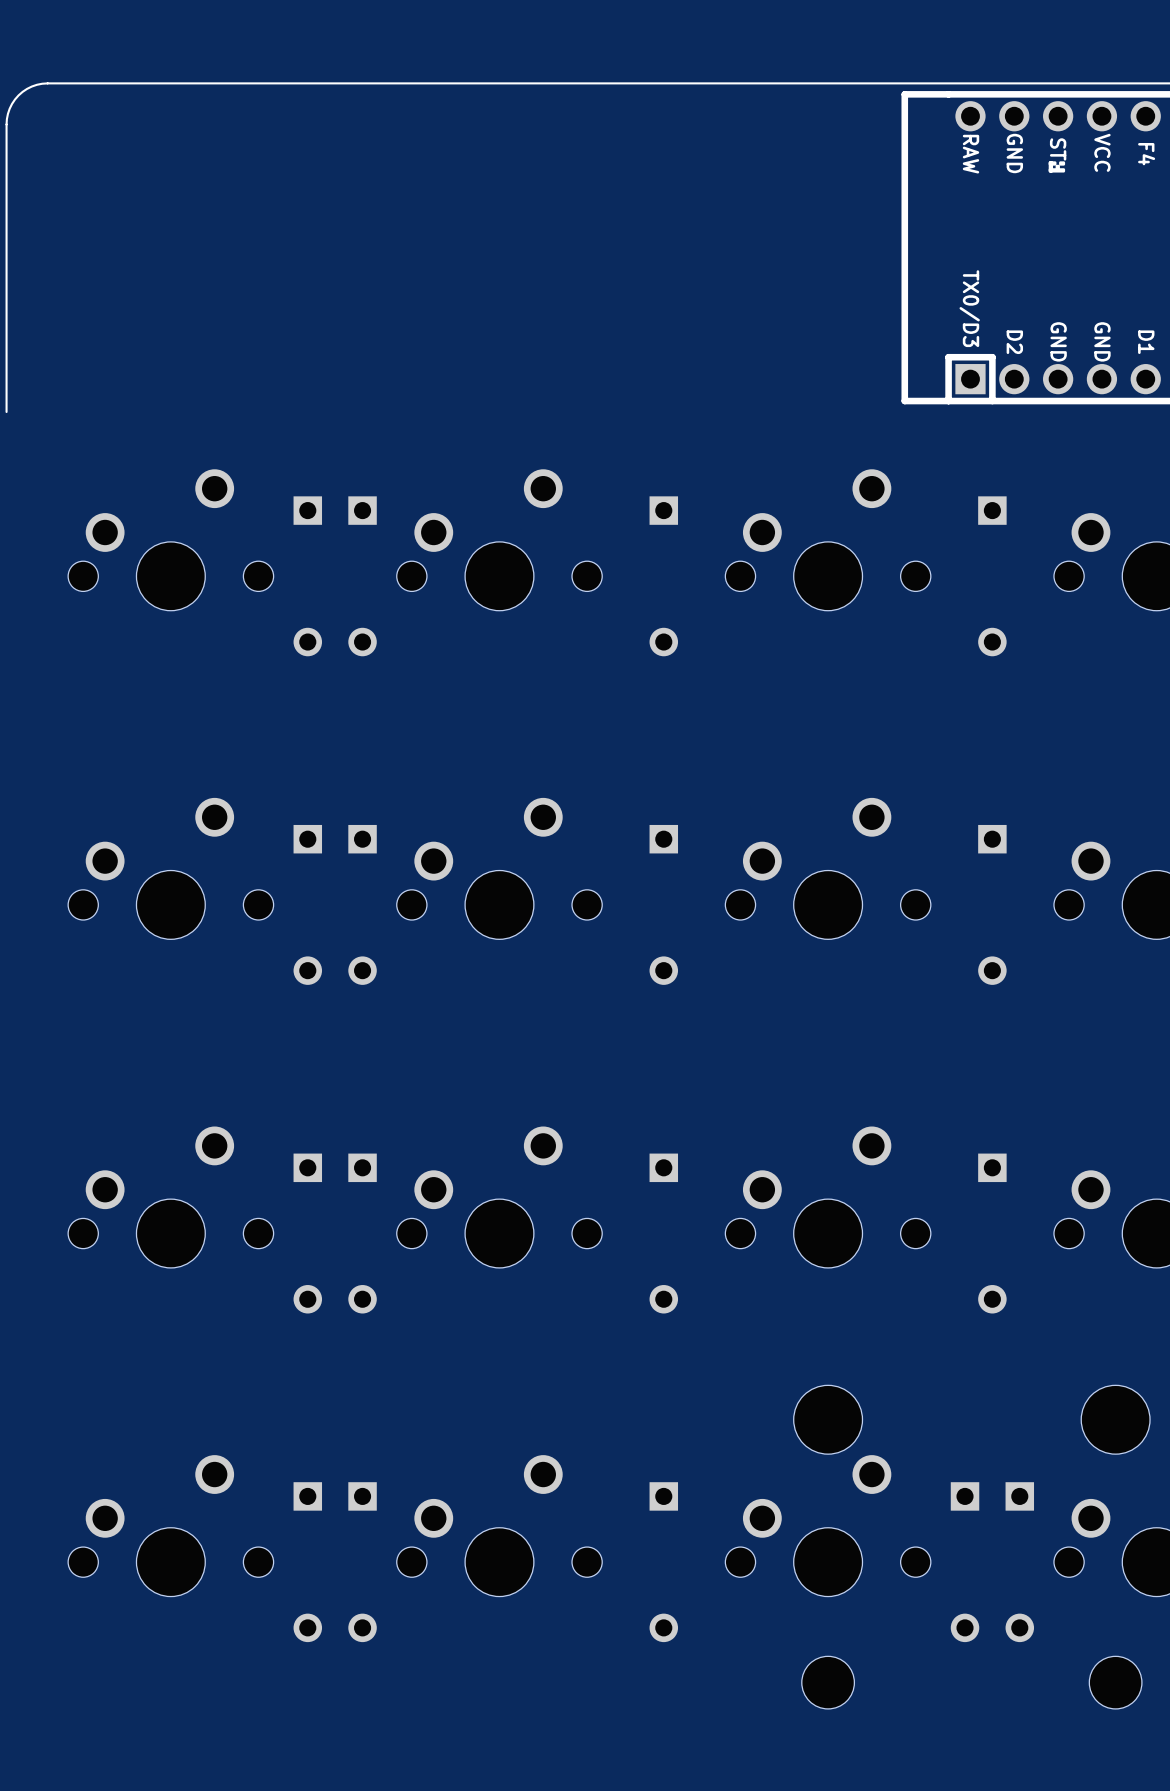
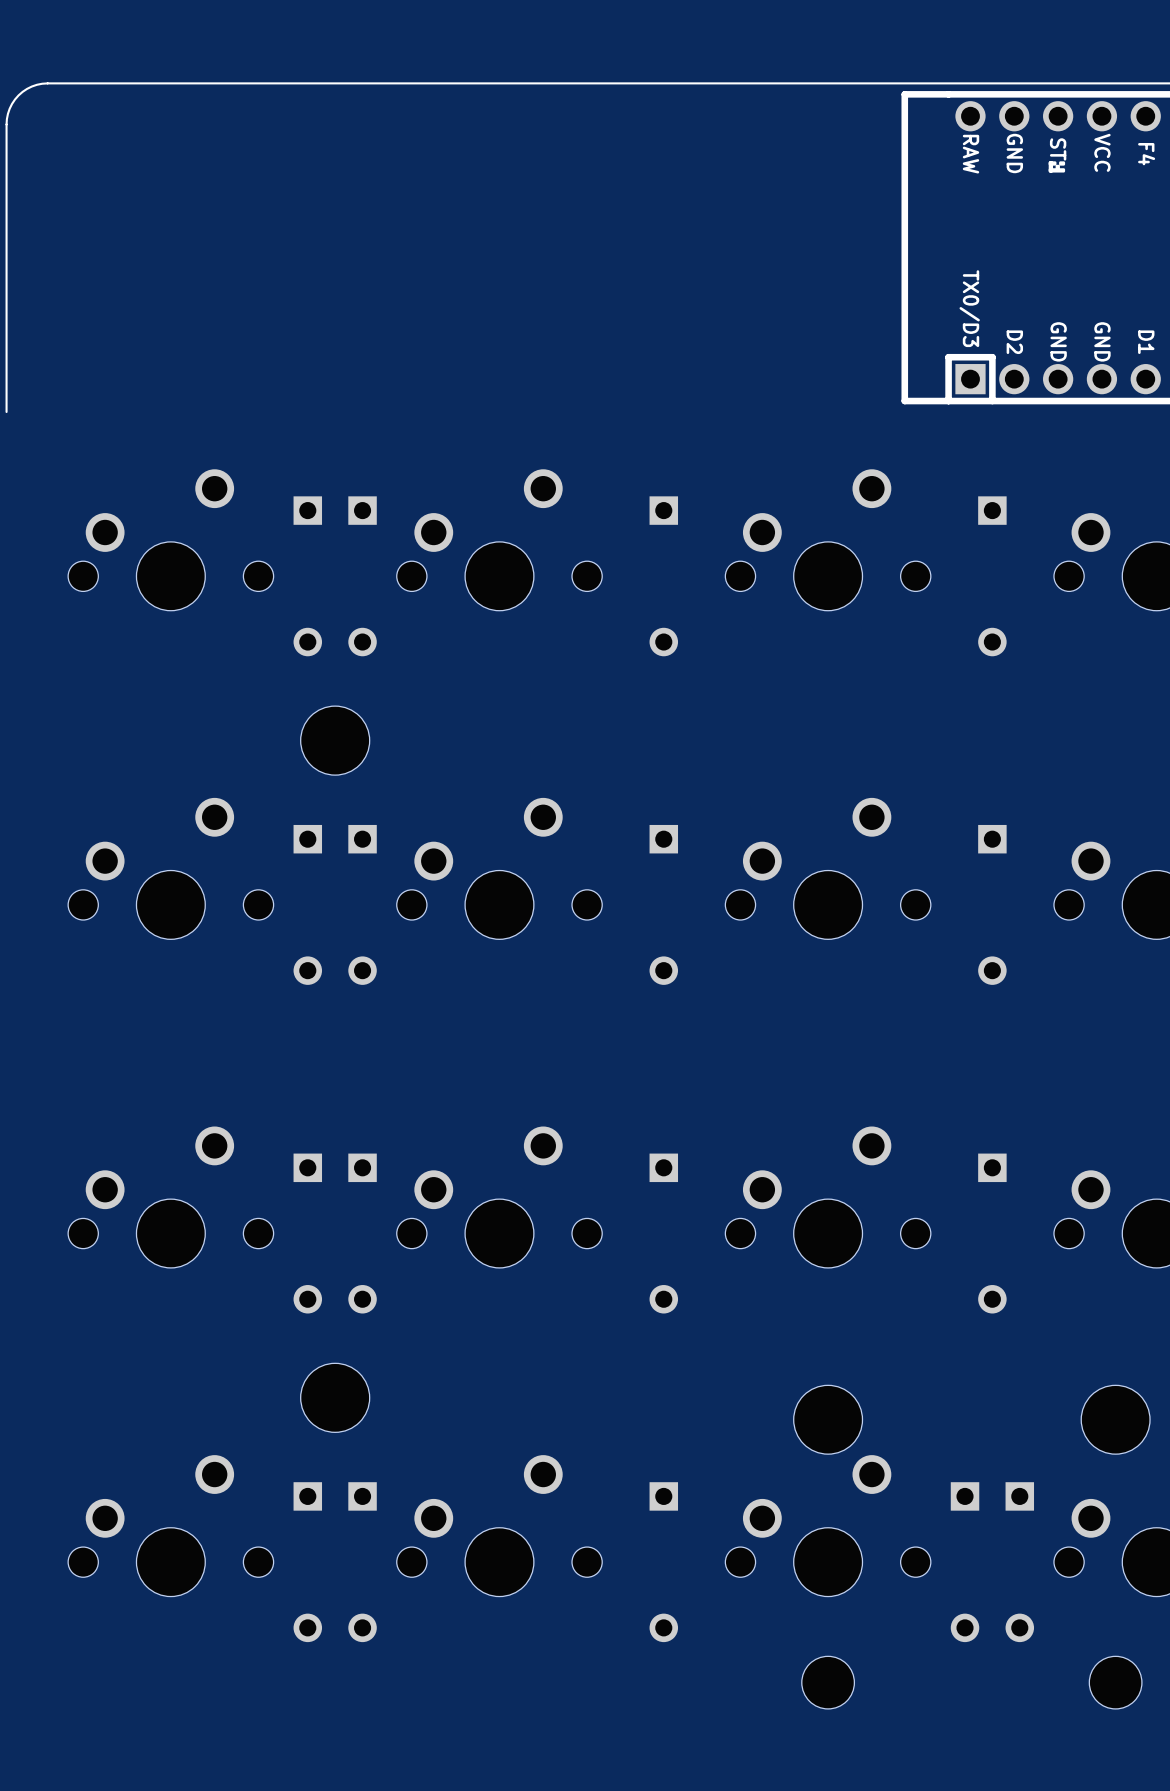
part: none -> (335, 740)
part: none -> (335, 1397)

